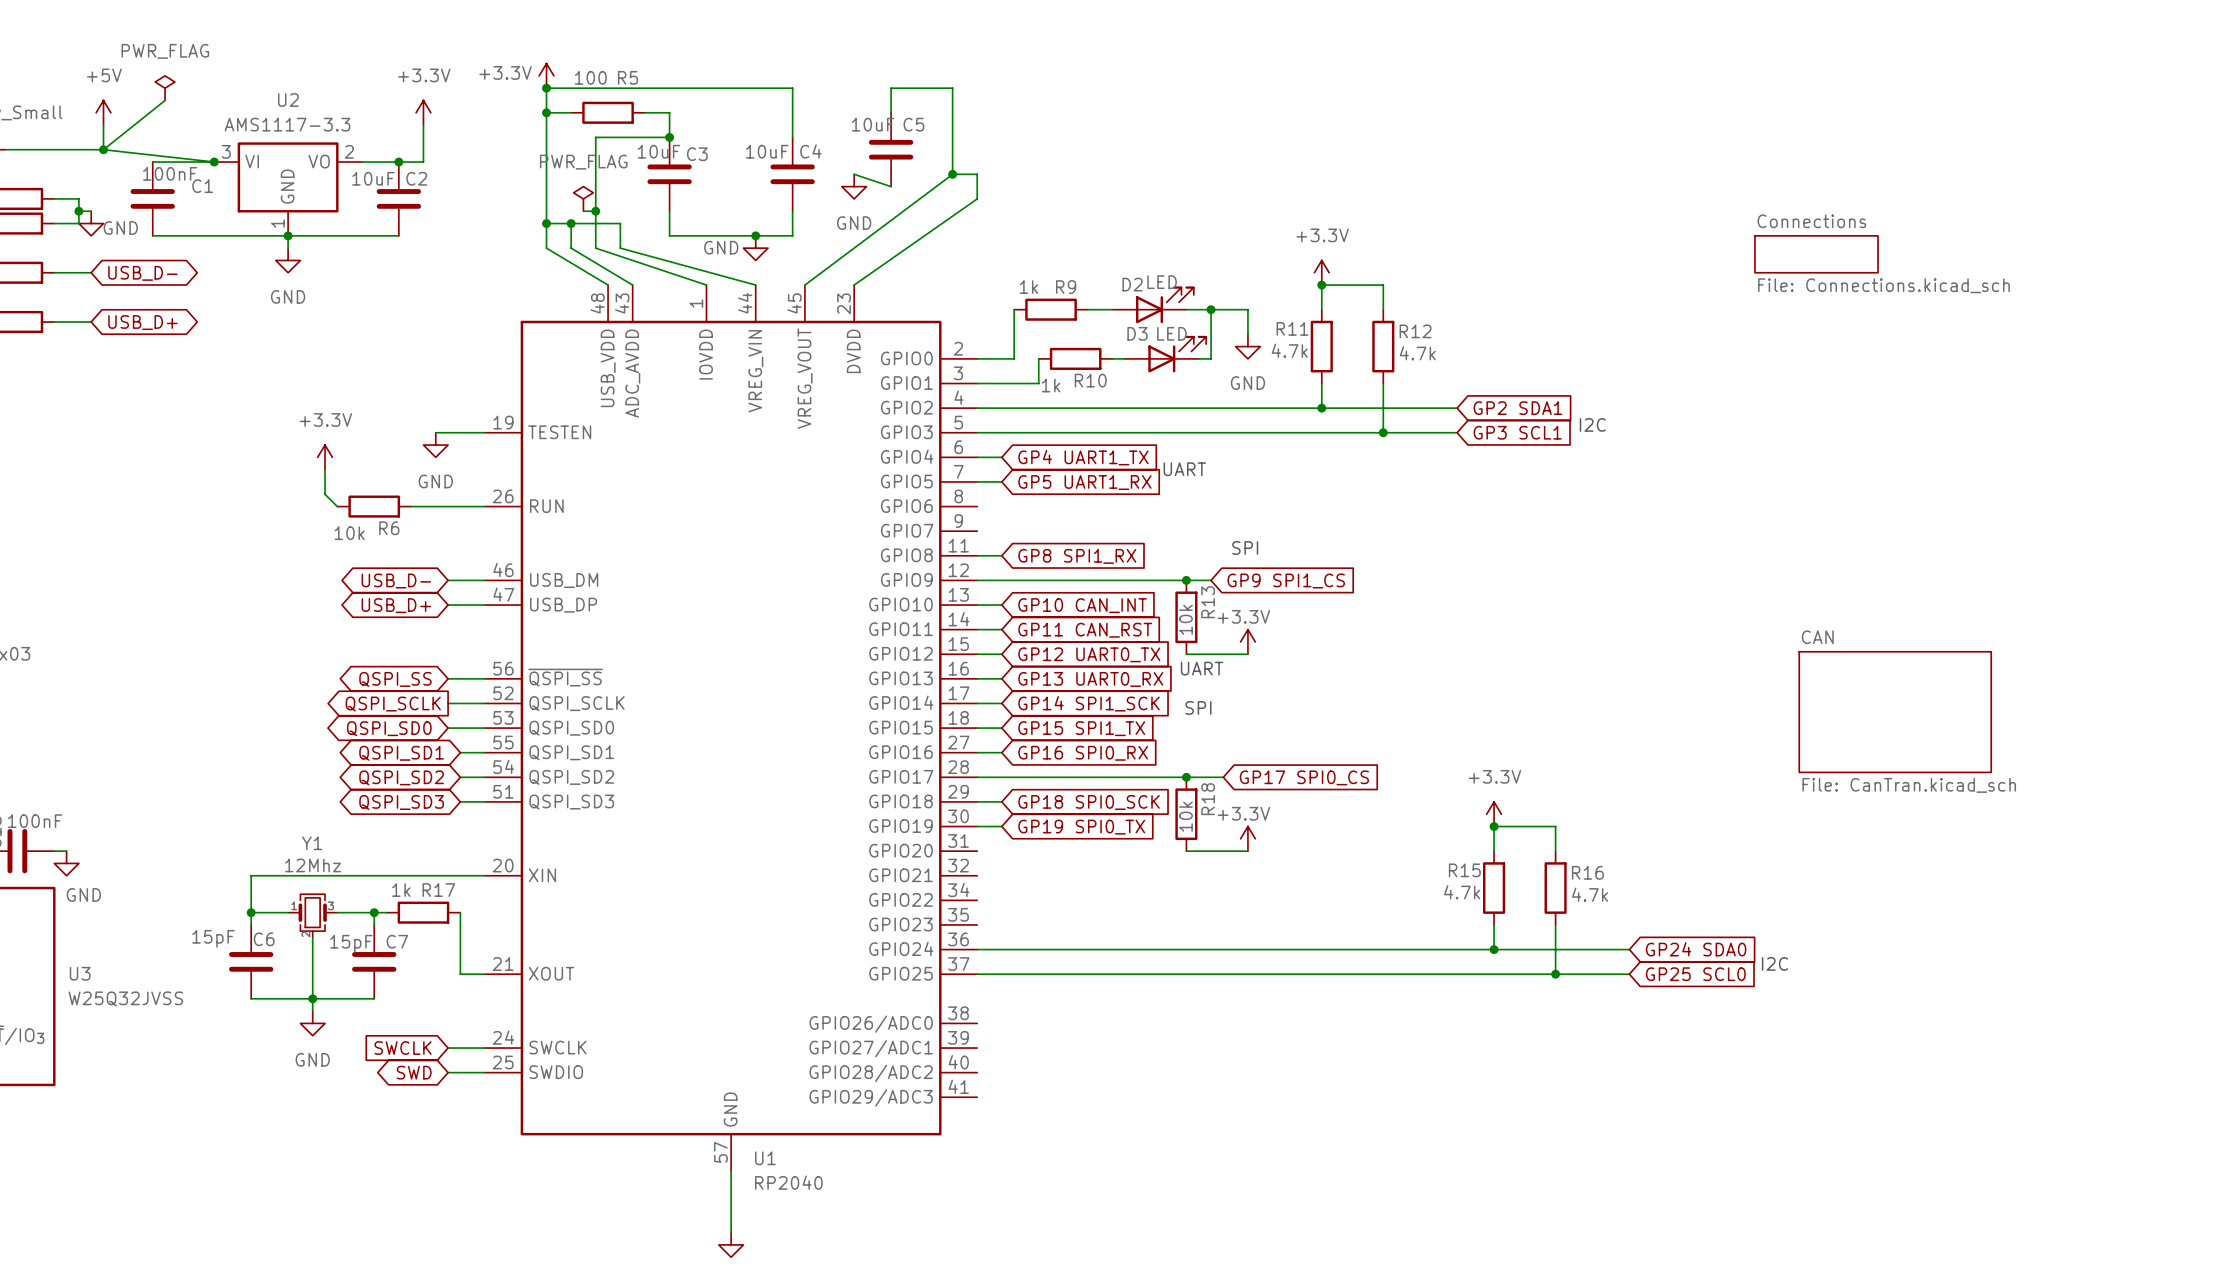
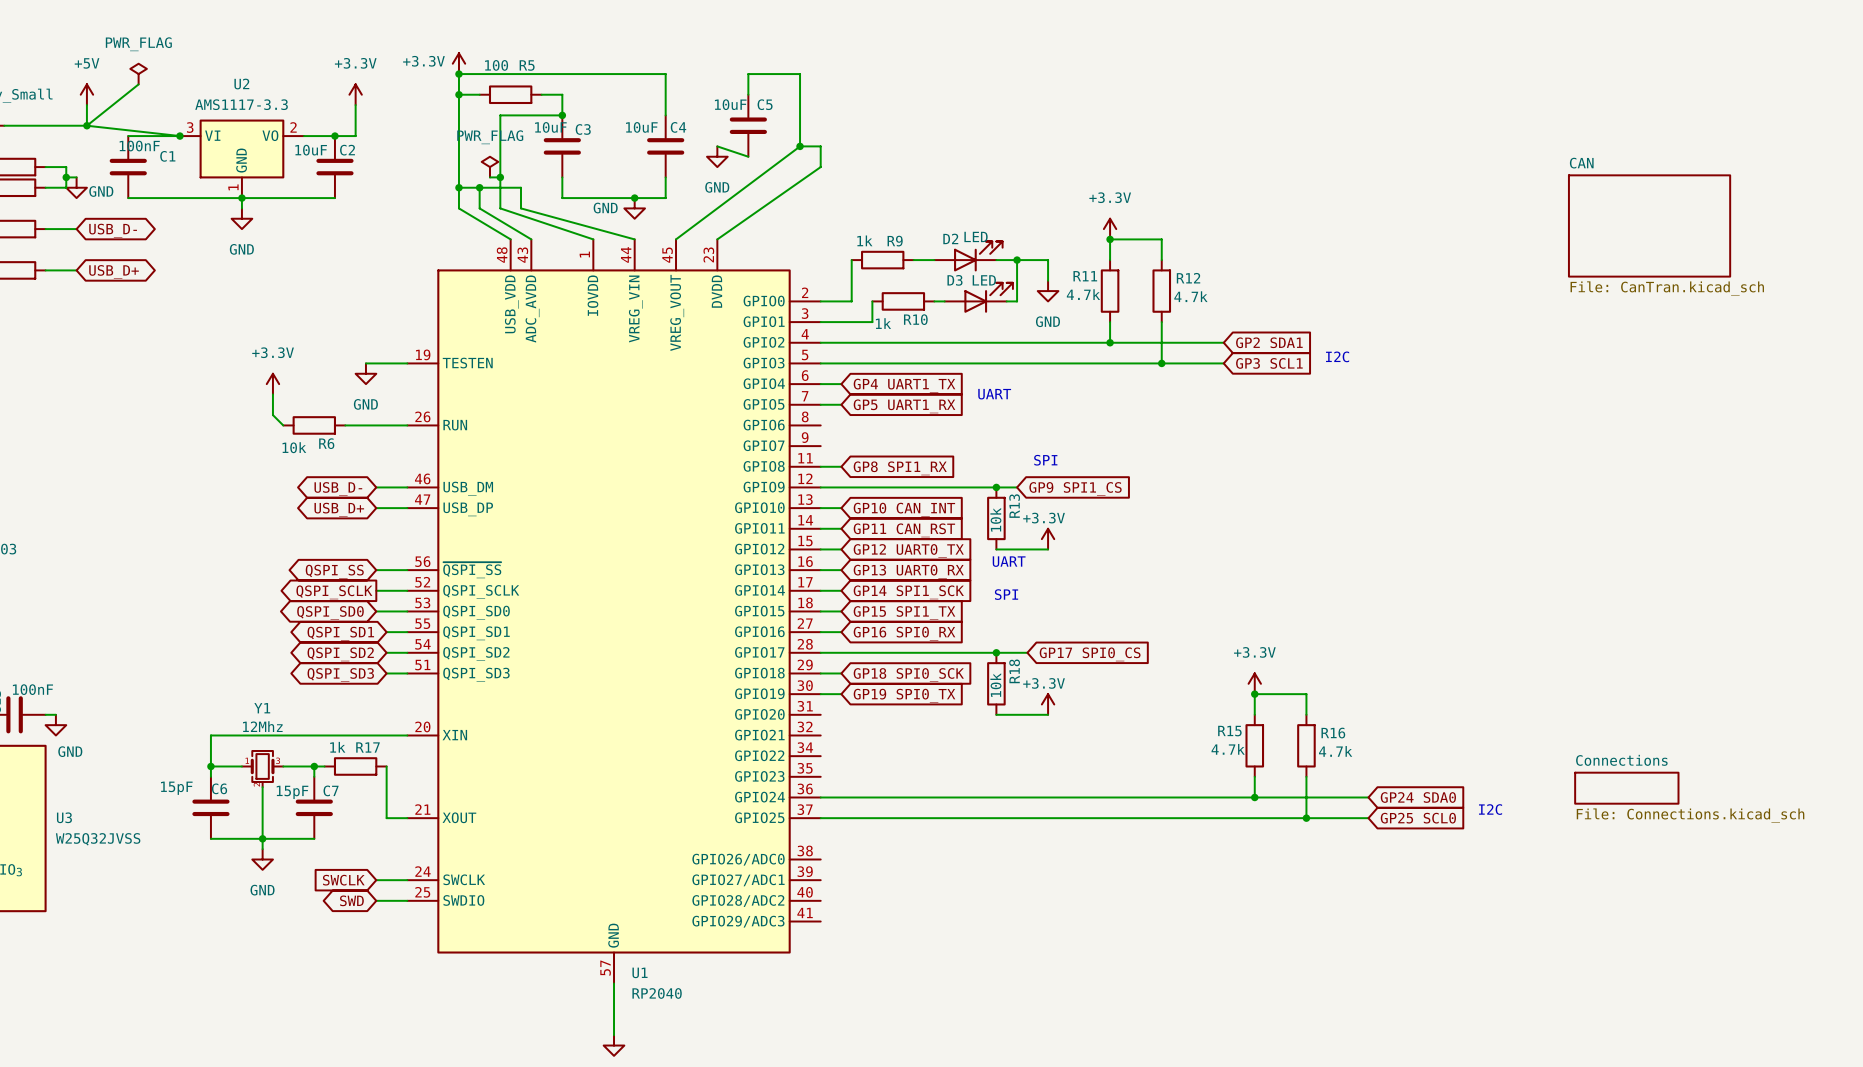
sheet Connections: File: Connections.kicad_sch (1816, 254) -> none
sheet CAN: none -> File: CanTran.kicad_sch (1649, 225)
sheet CAN: File: CanTran.kicad_sch (1895, 712) -> none
sheet Connections: none -> File: Connections.kicad_sch (1626, 788)

